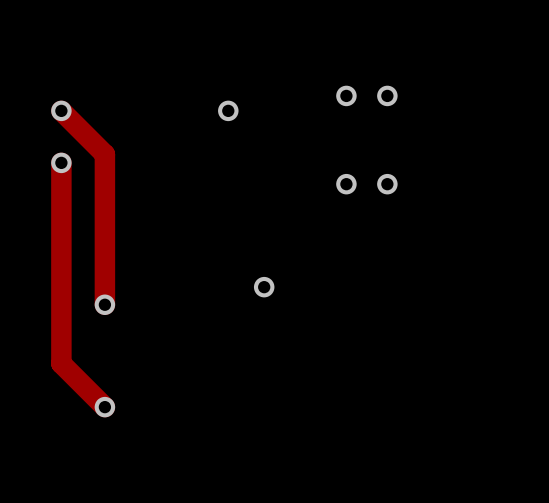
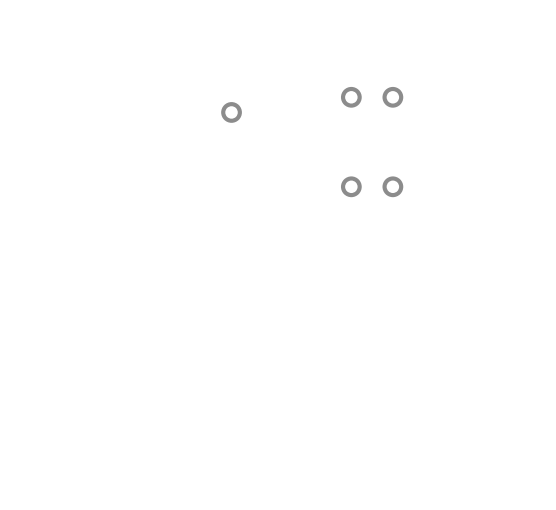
track: (61, 110) (104, 154) (104, 304) -> none
via: (61, 110) -> none
track: (61, 162) (61, 363) (104, 407) -> none
via: (61, 162) -> none
via: (264, 287) -> none
via: (104, 304) -> none
via: (104, 407) -> none

